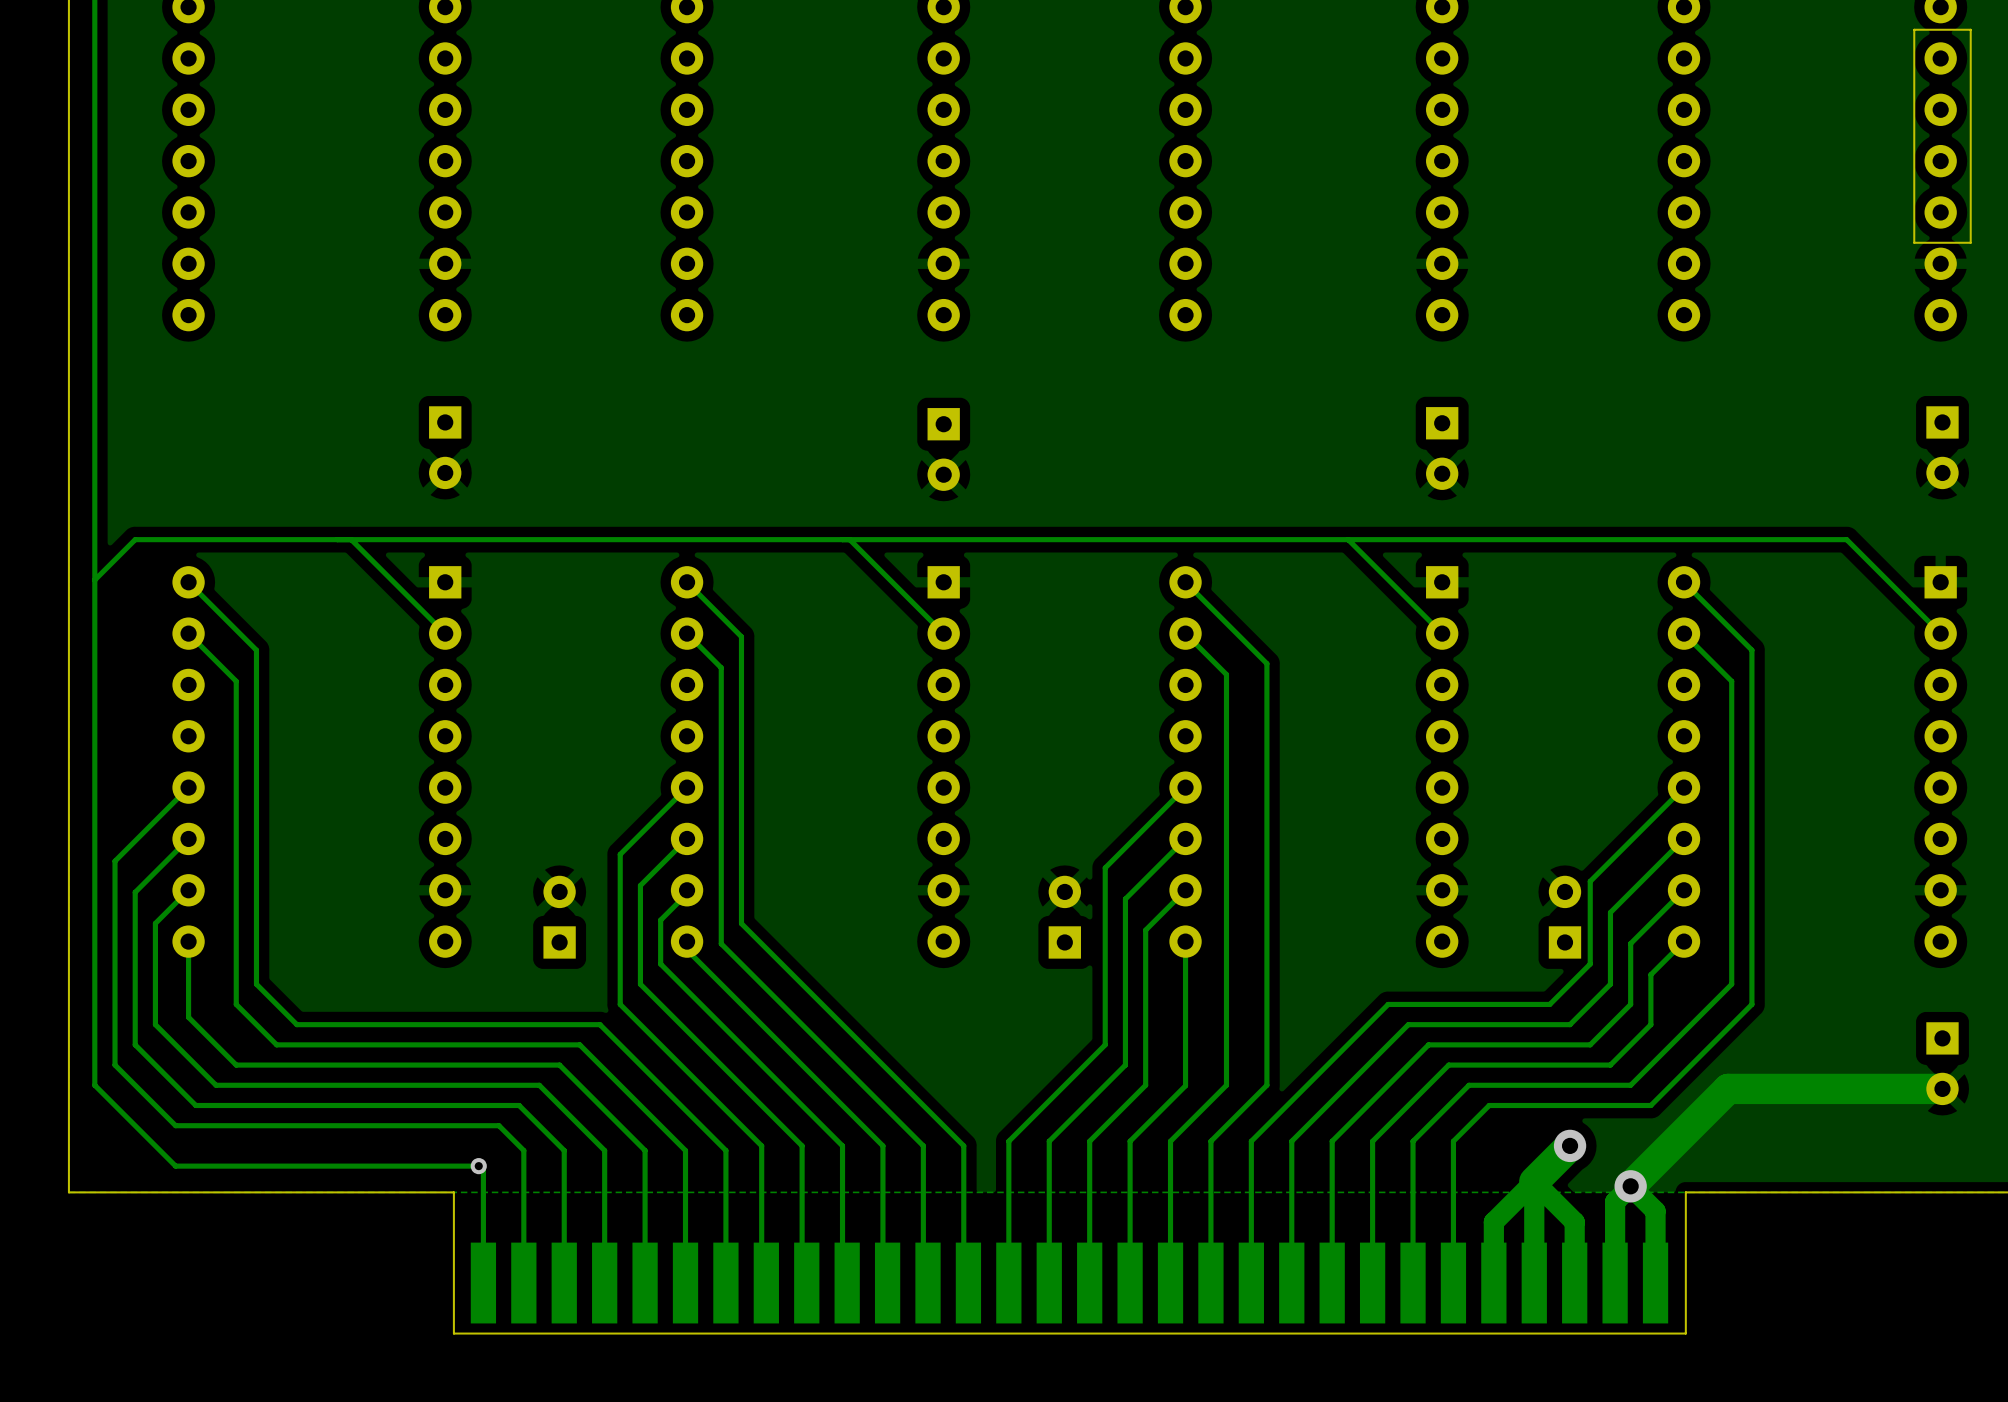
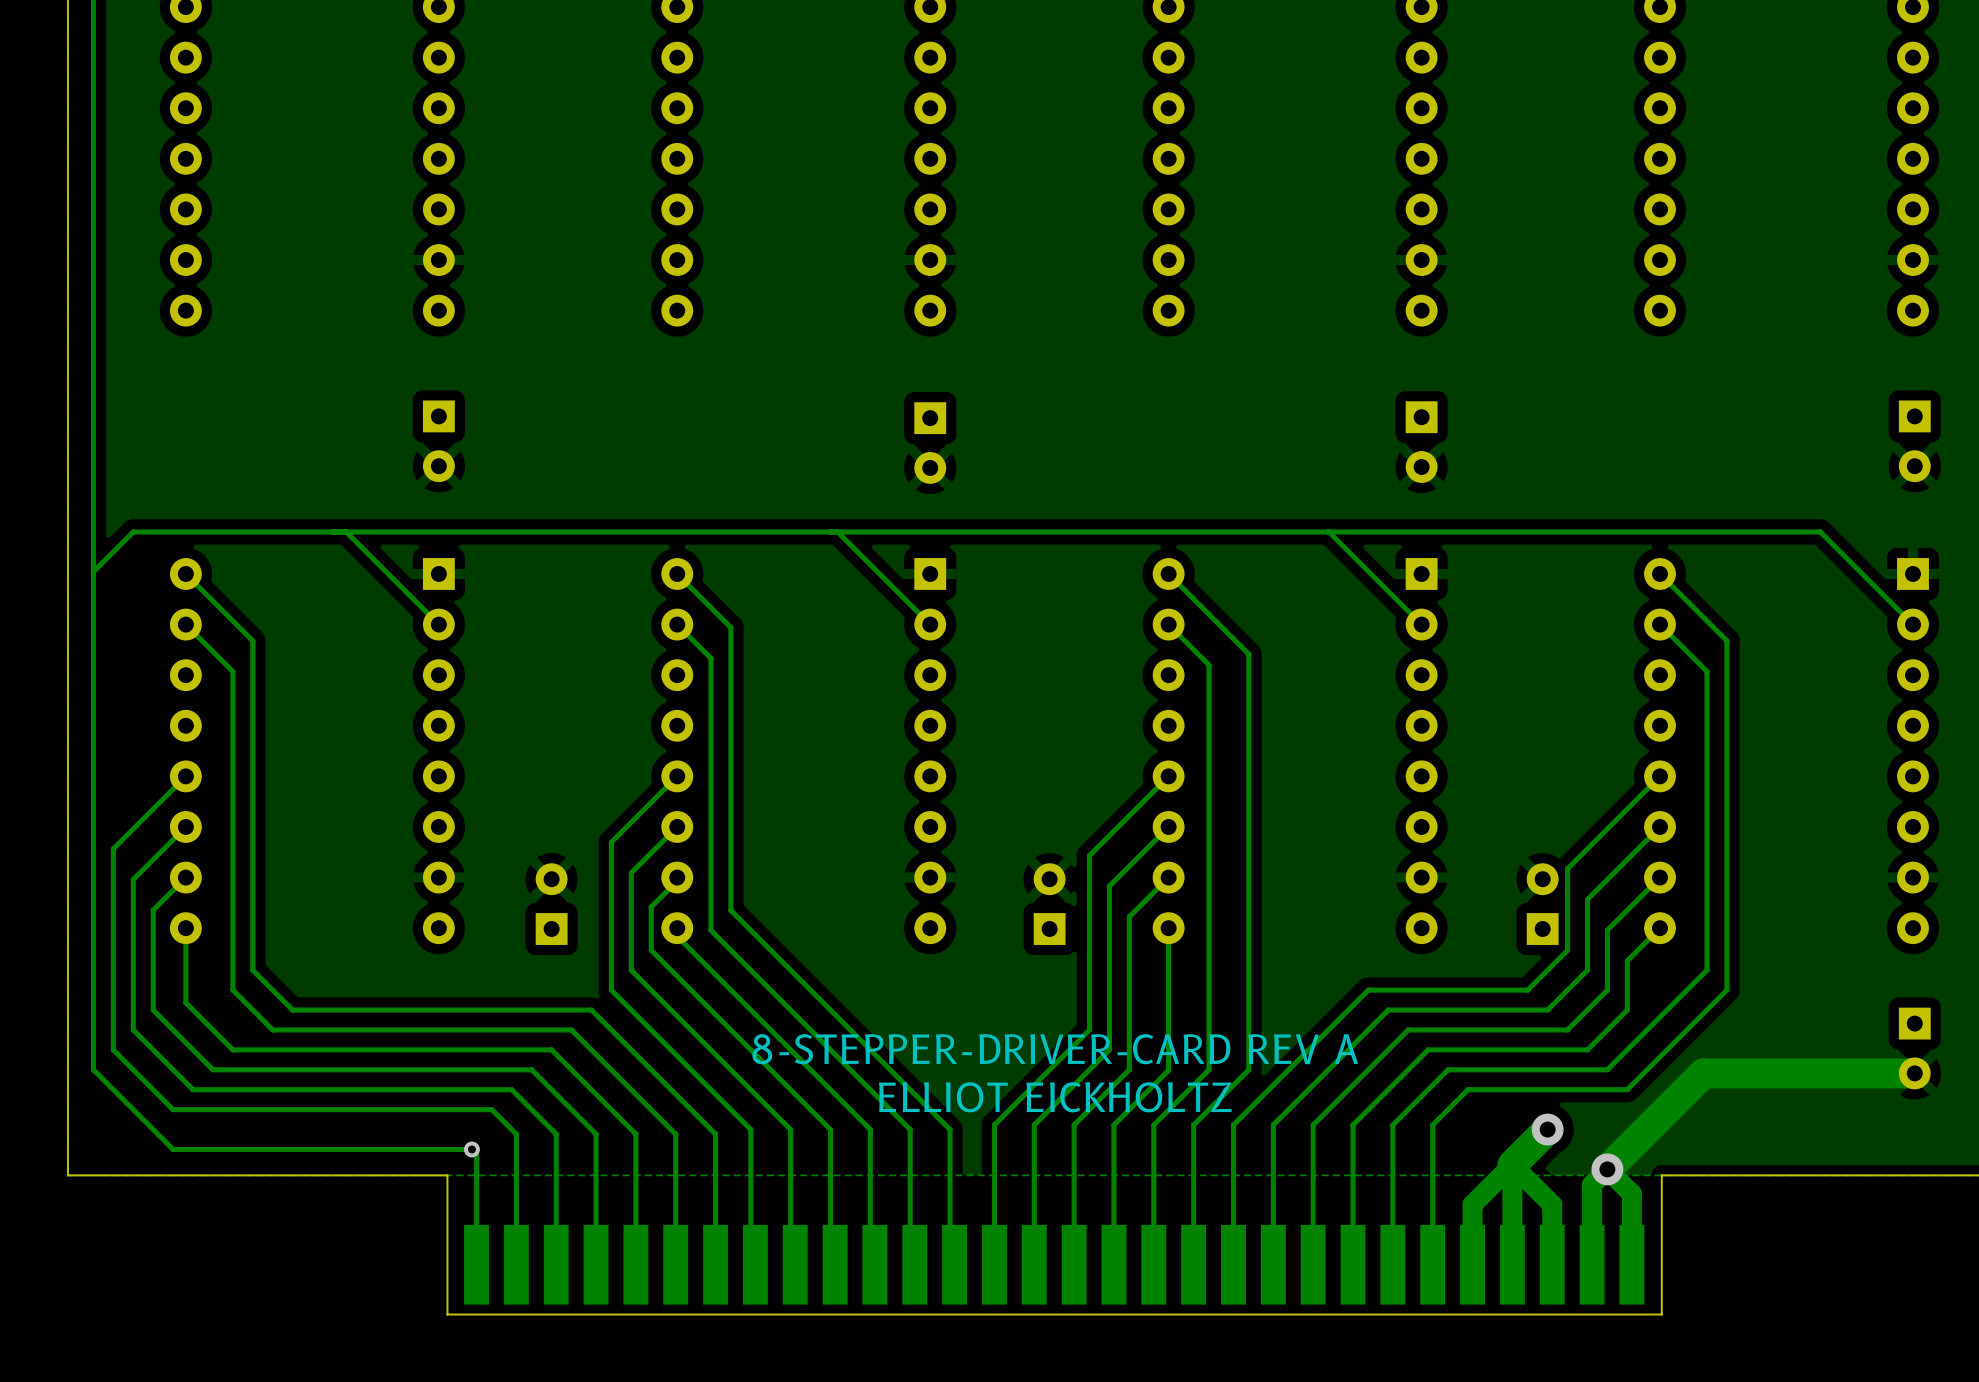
board edge: (1970, 29) (1914, 29) (1914, 242) (1970, 242) (1970, 29) -> none
text: none -> 8-STEPPER-DRIVER-CARD REV A (1055, 1049)
text: none -> ELLIOT EICKHOLTZ (1055, 1097)

